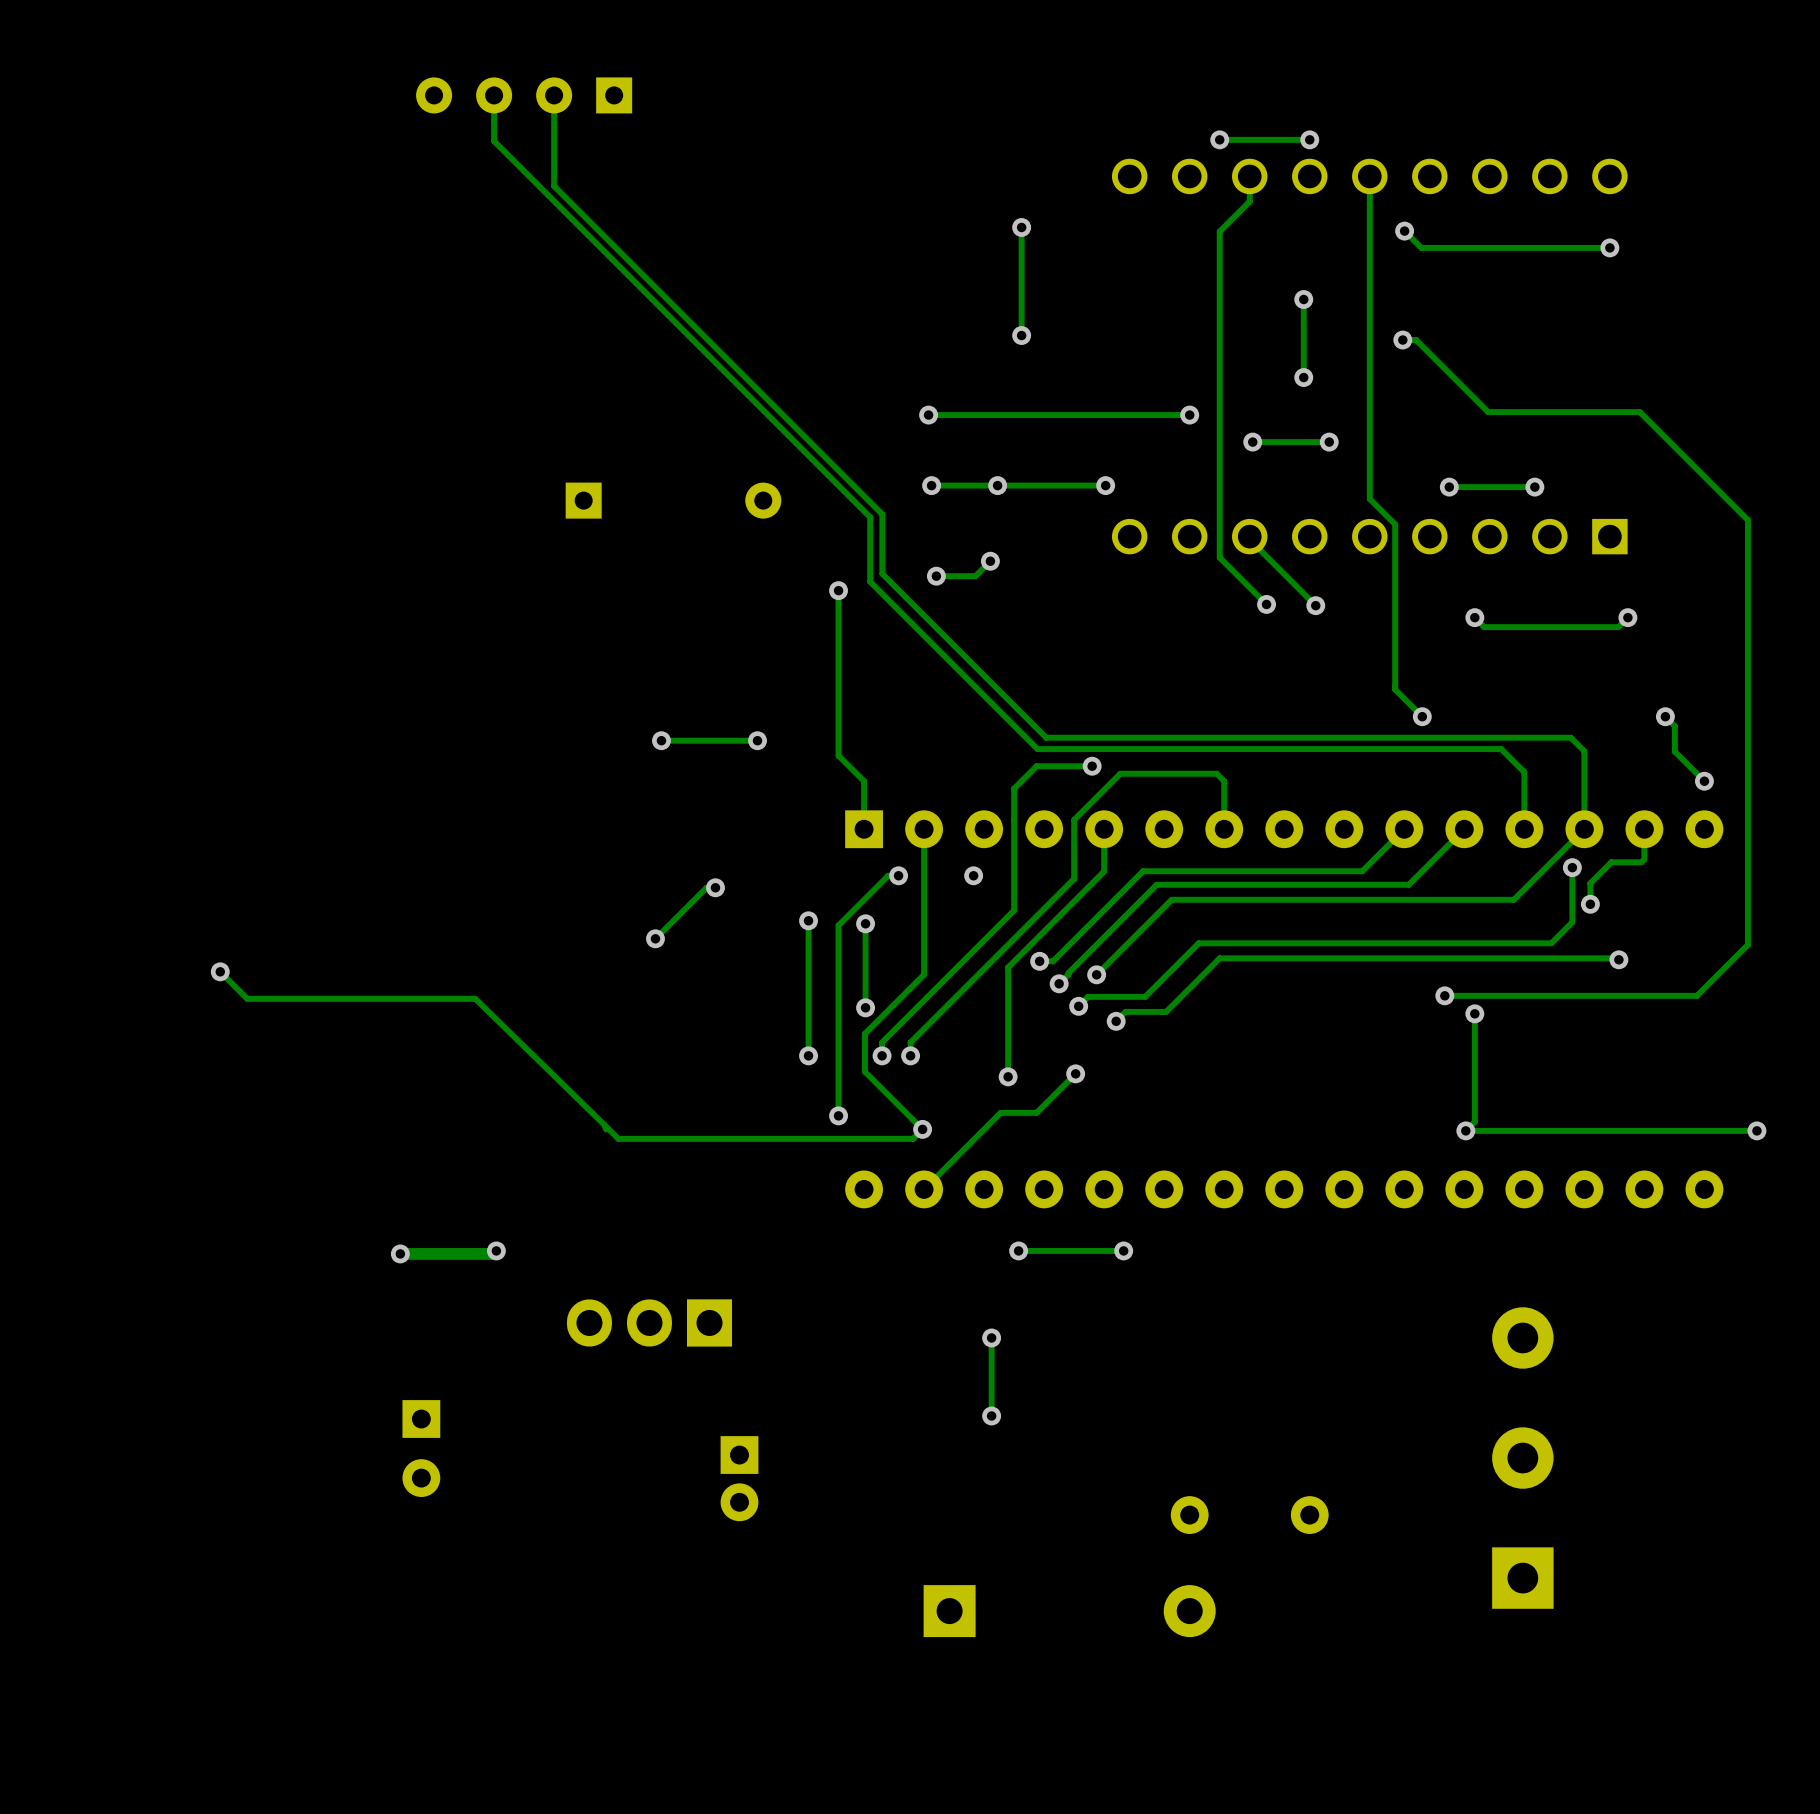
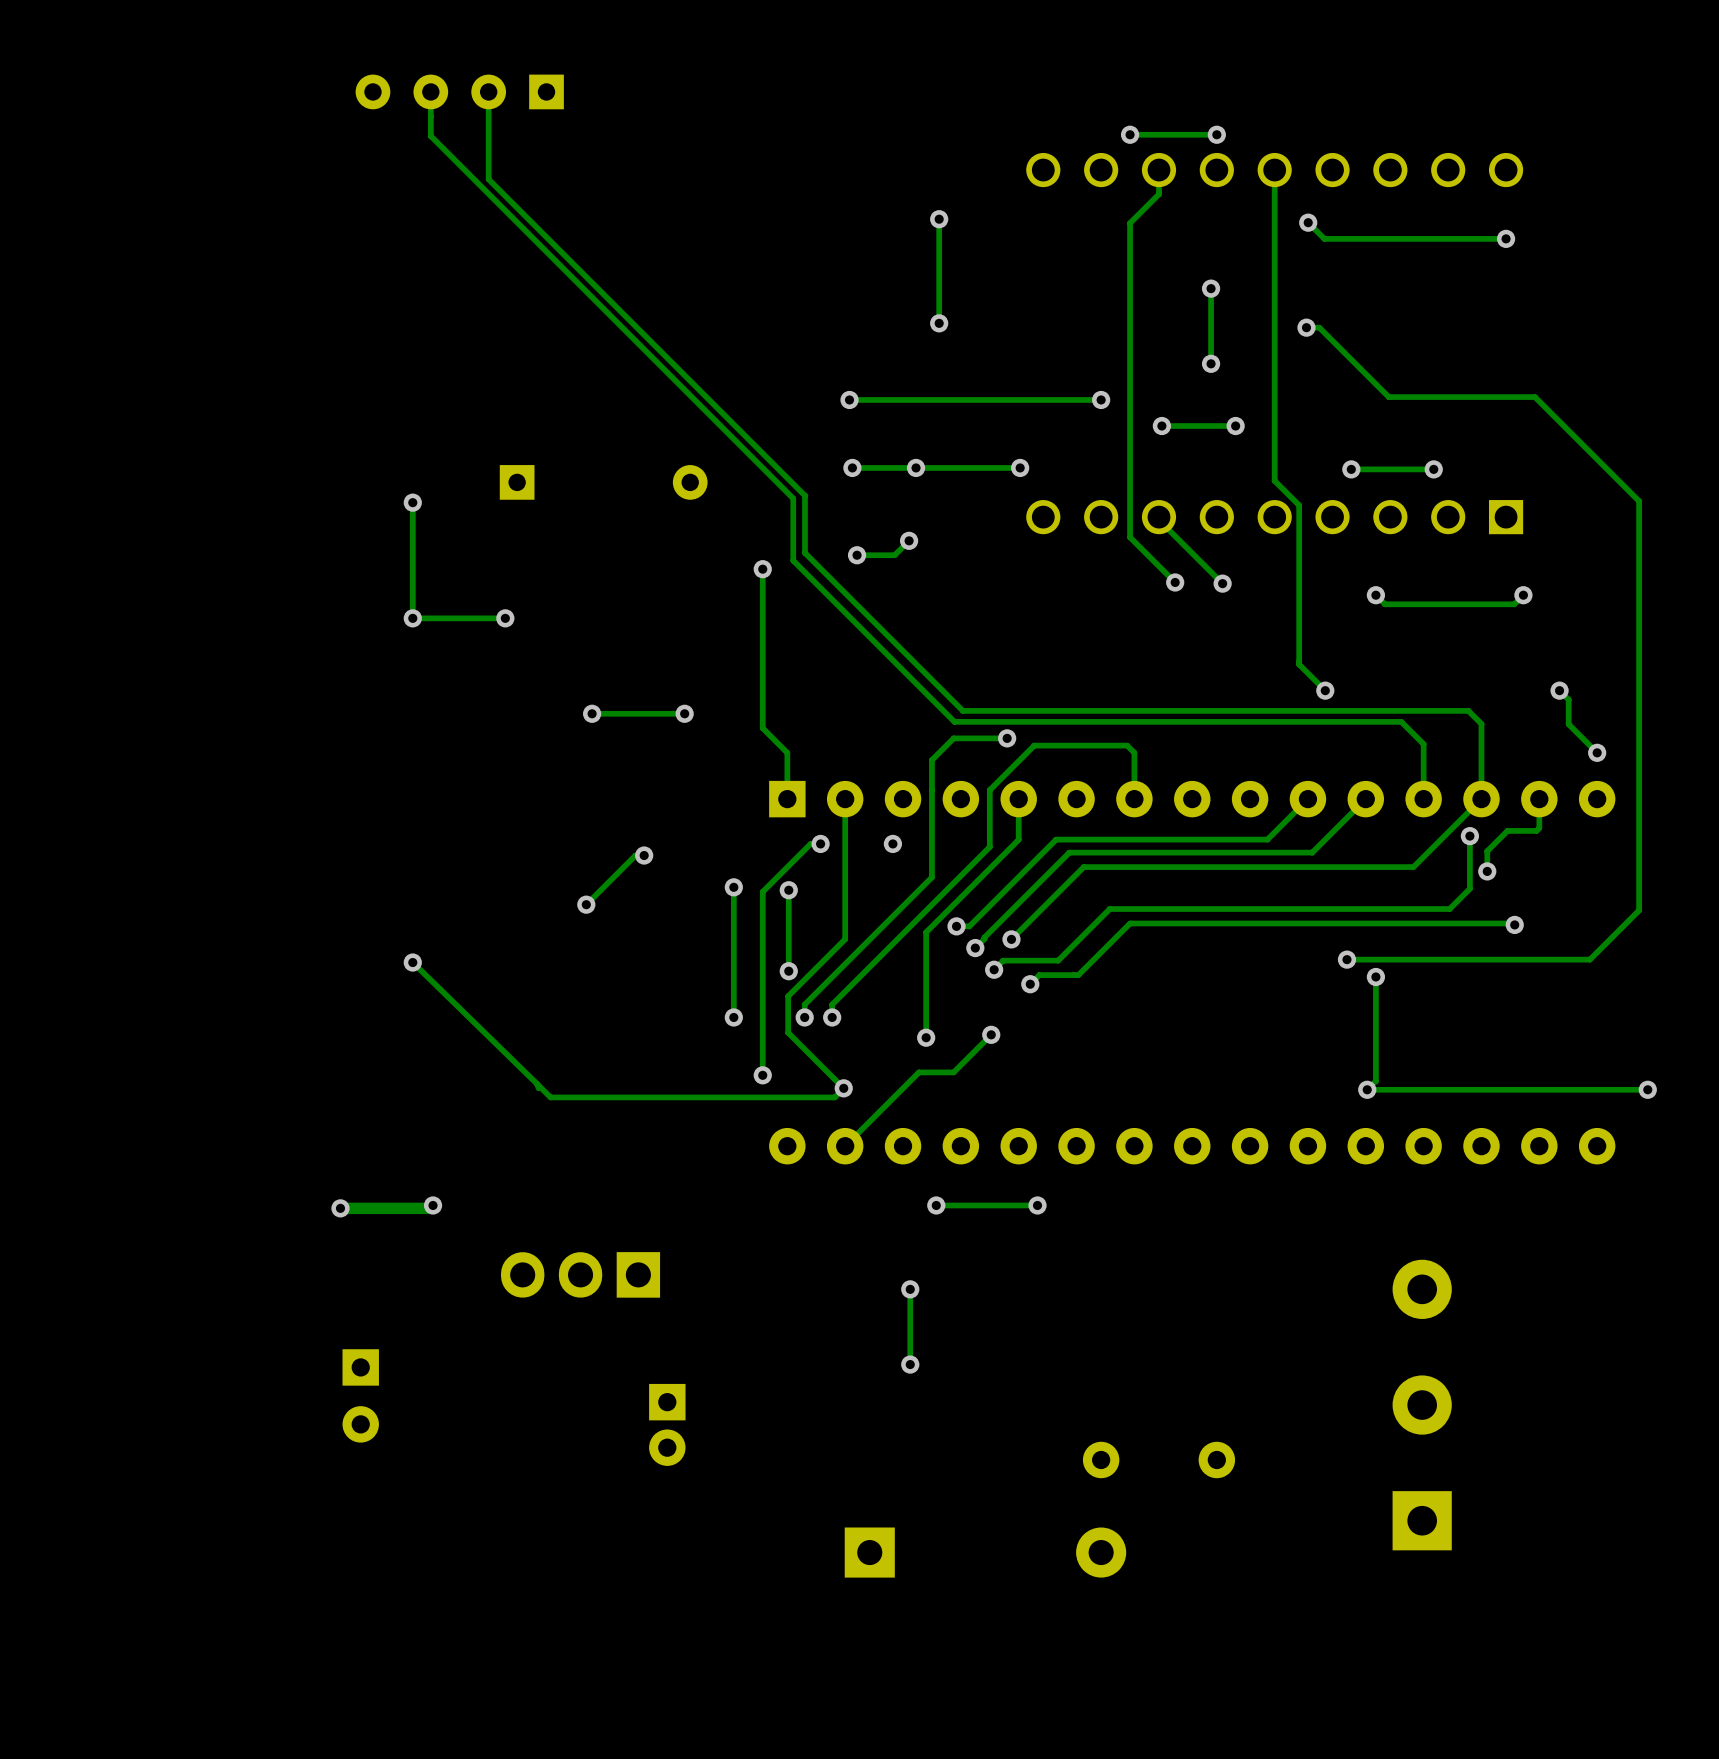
track: none -> (412, 502) (412, 618) (505, 618)
via: none -> (412, 502)
via: none -> (412, 618)
via: none -> (505, 618)
track: (220, 971) (247, 998) (475, 998) -> none
via: (220, 971) -> none
via: none -> (412, 962)

